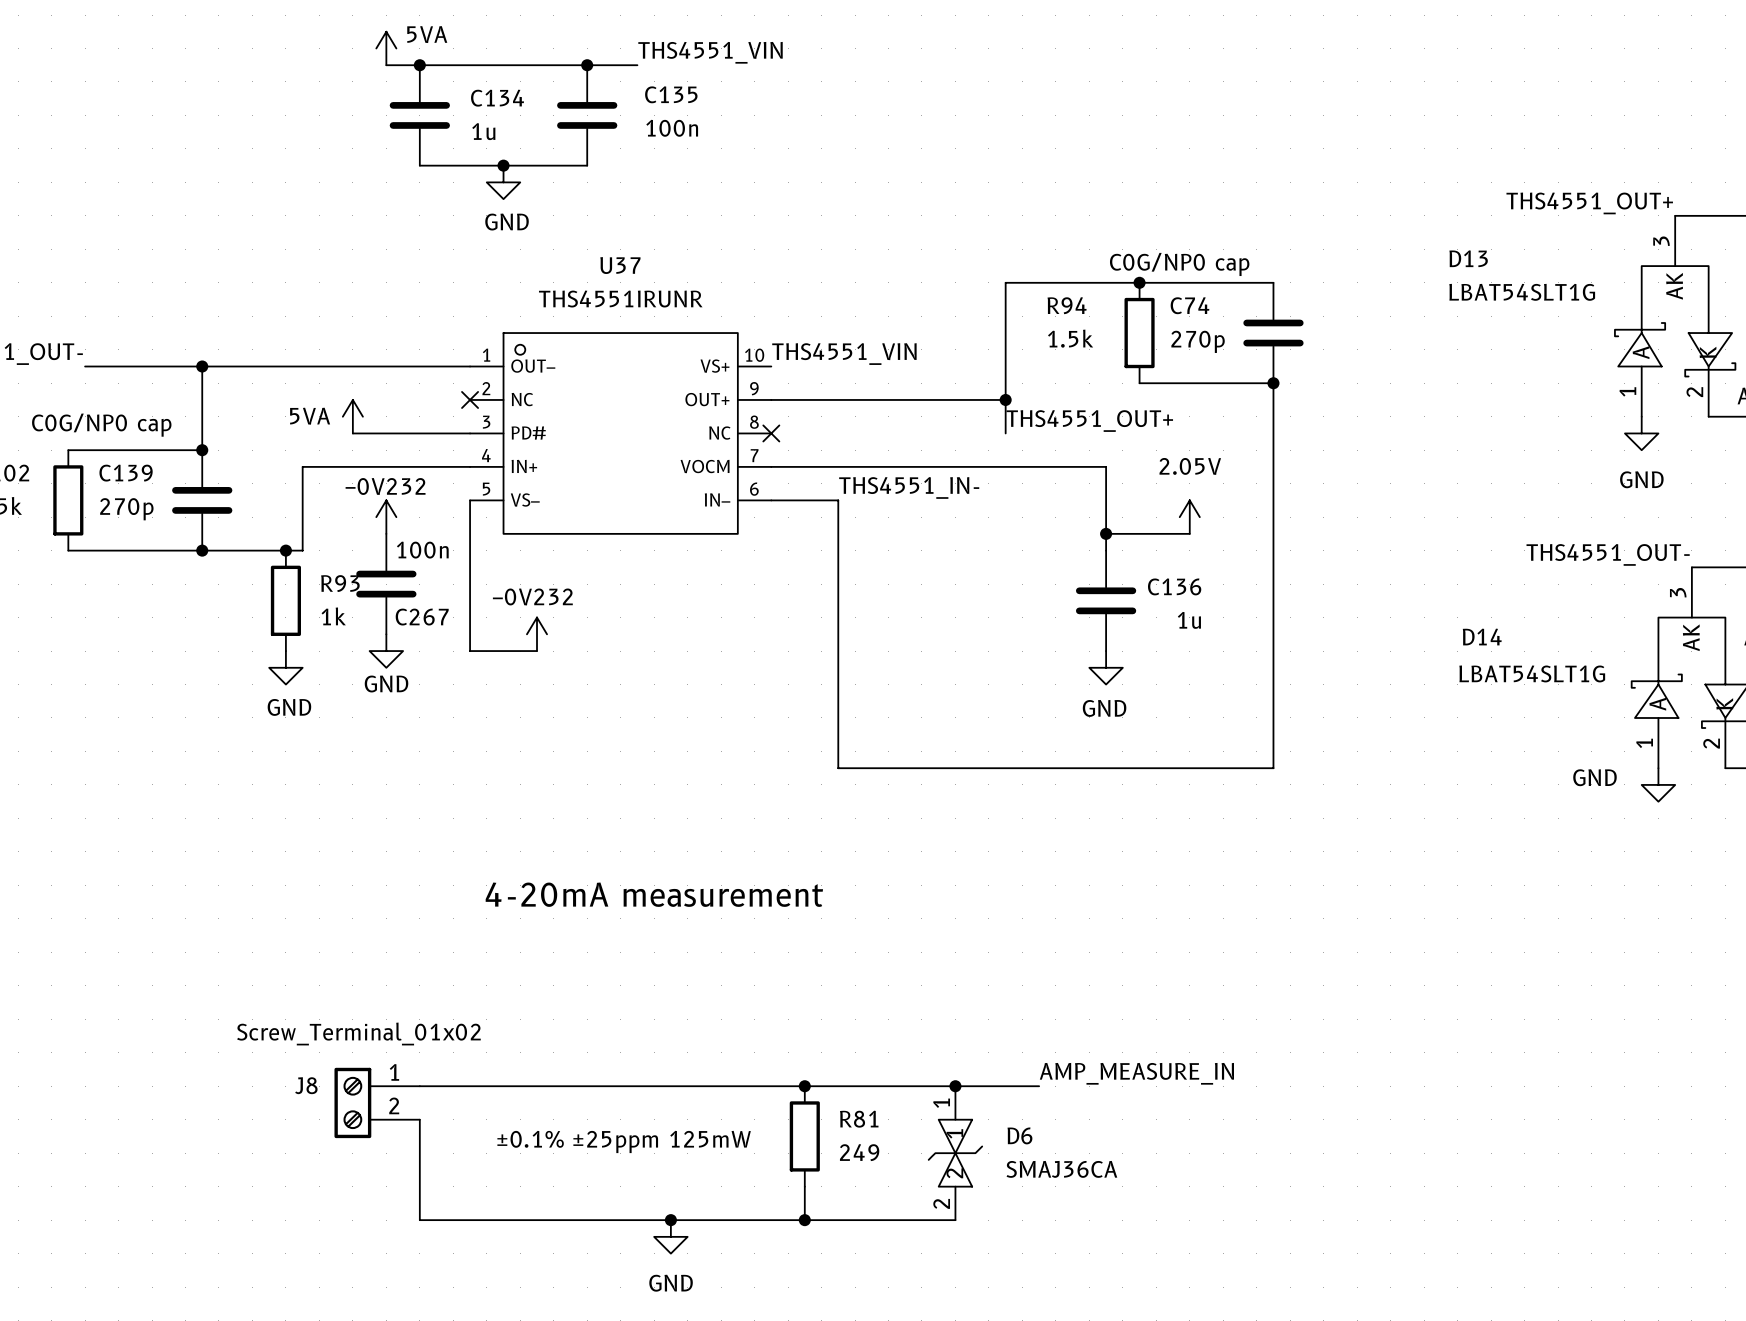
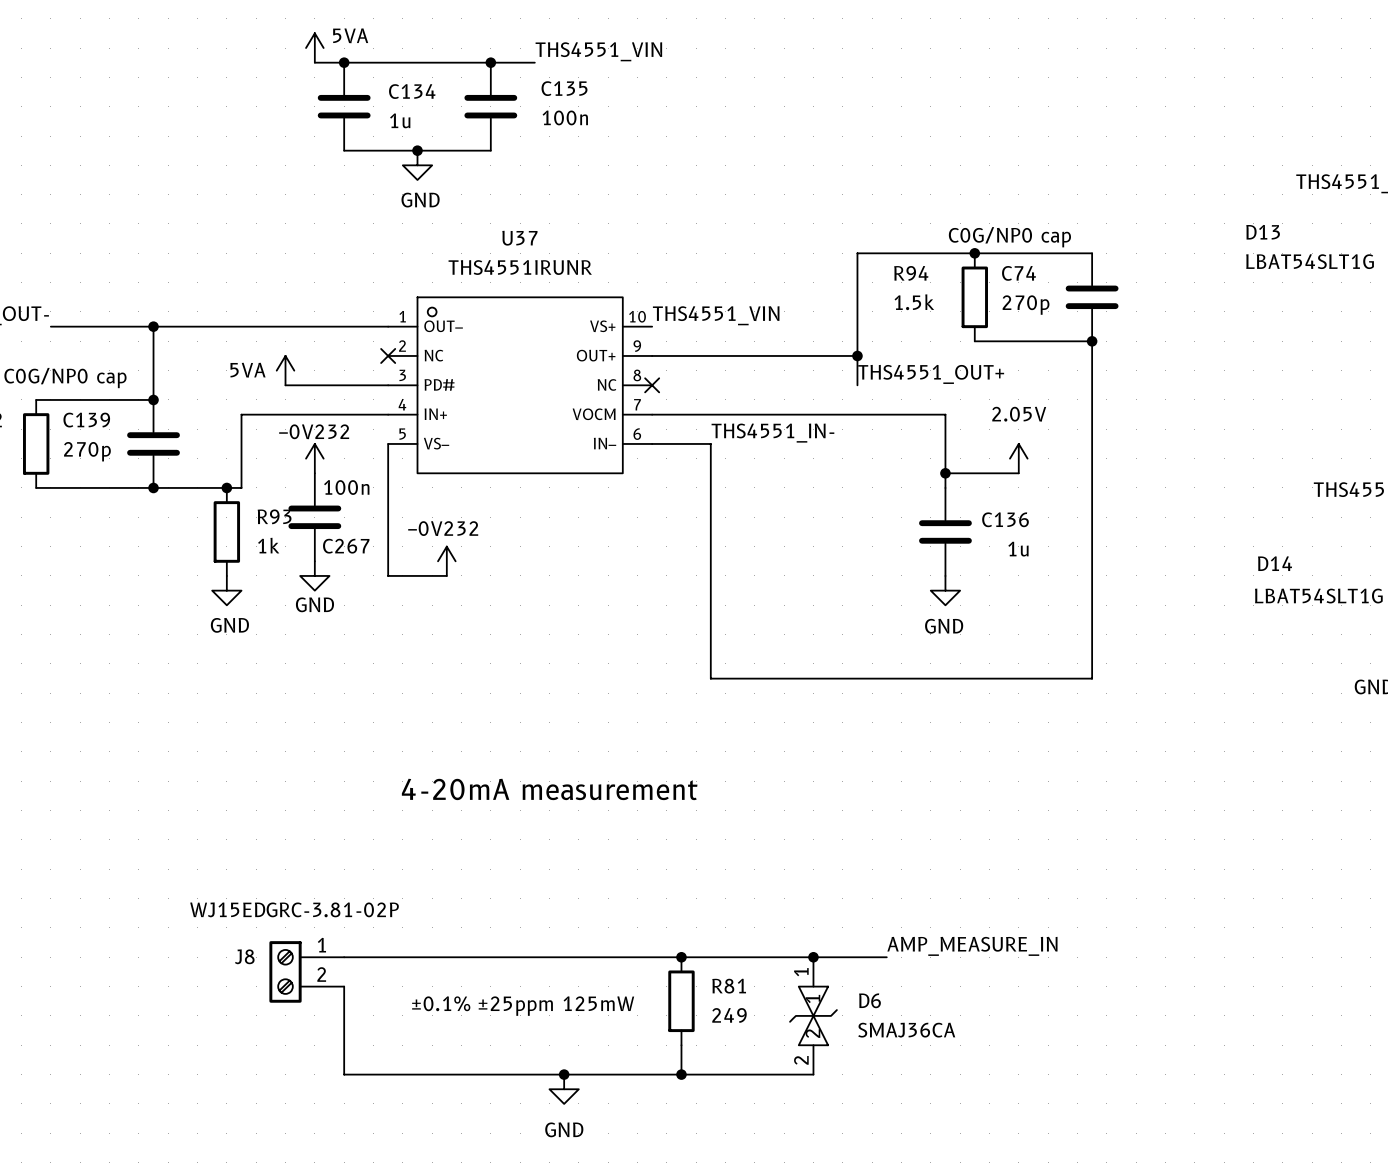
J8 value: Screw_Terminal_01x02 (358, 1034) -> WJ15EDGRC-3.81-02P (294, 909)

